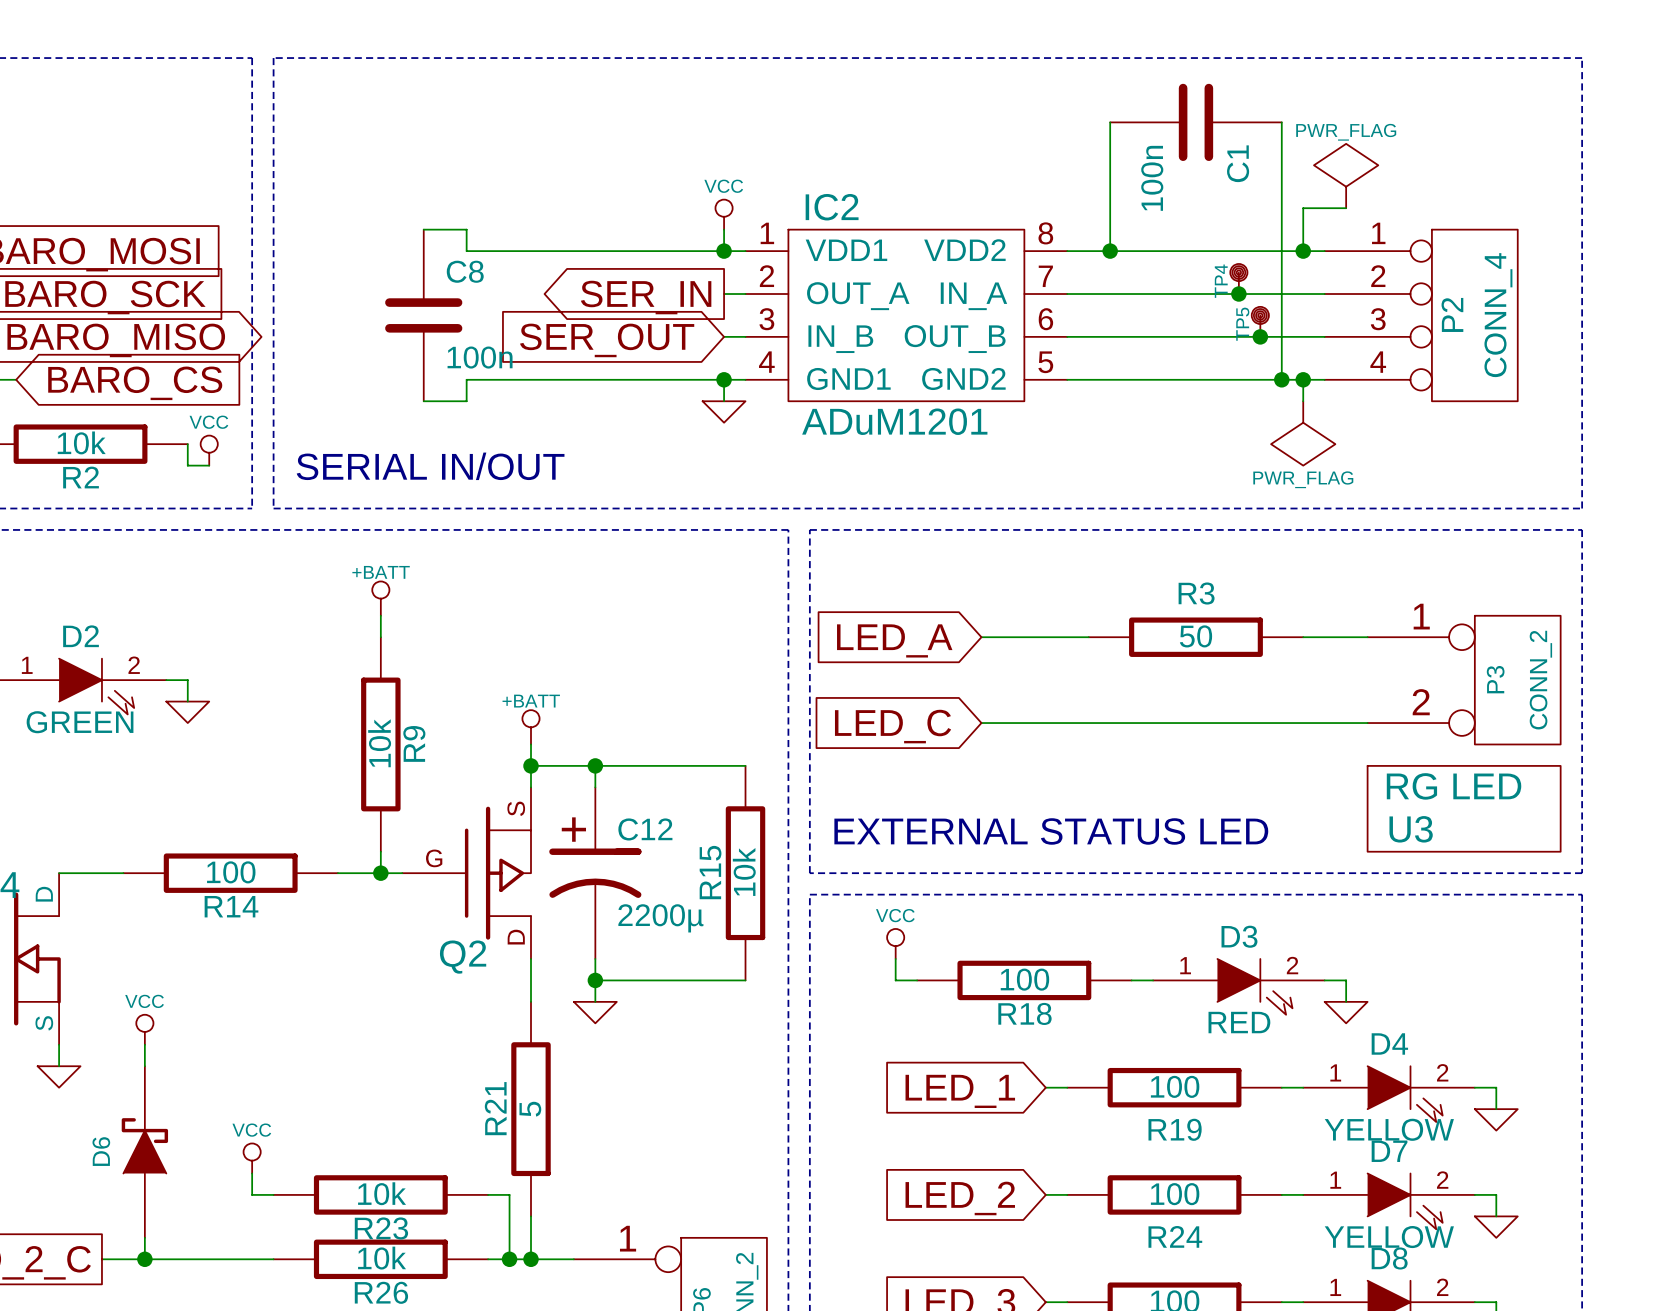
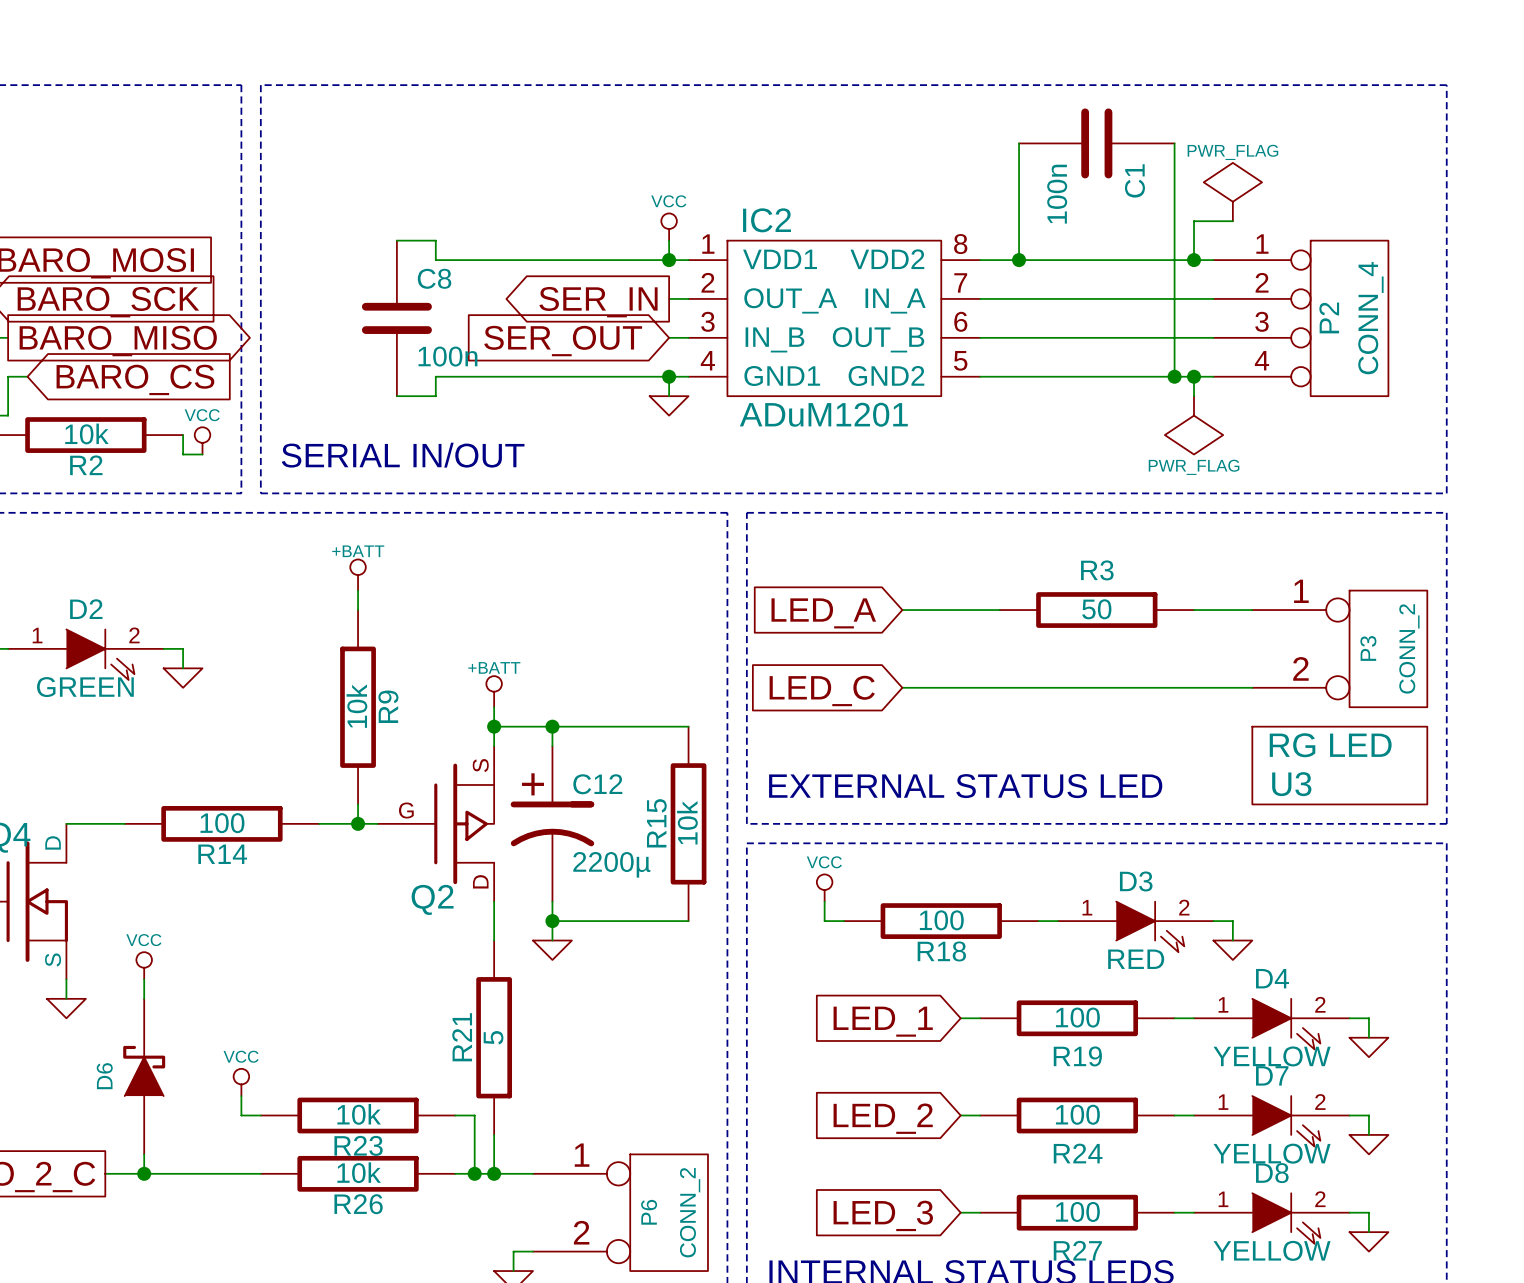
TP4: (1238, 278) -> none
junction: (1238, 294) -> none
TP5: (1260, 321) -> none
junction: (1260, 336) -> none

